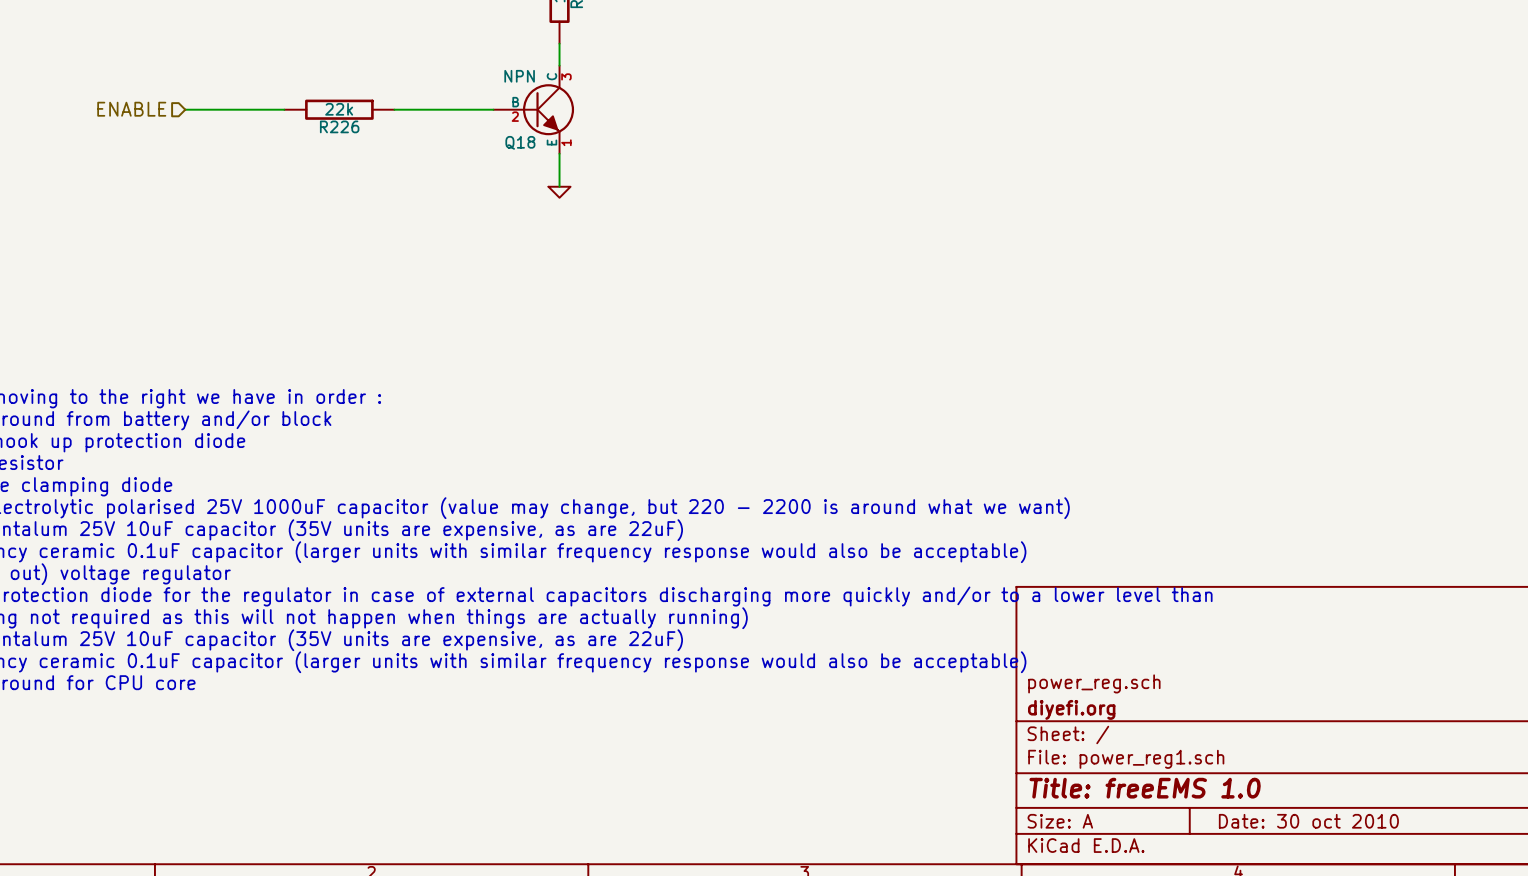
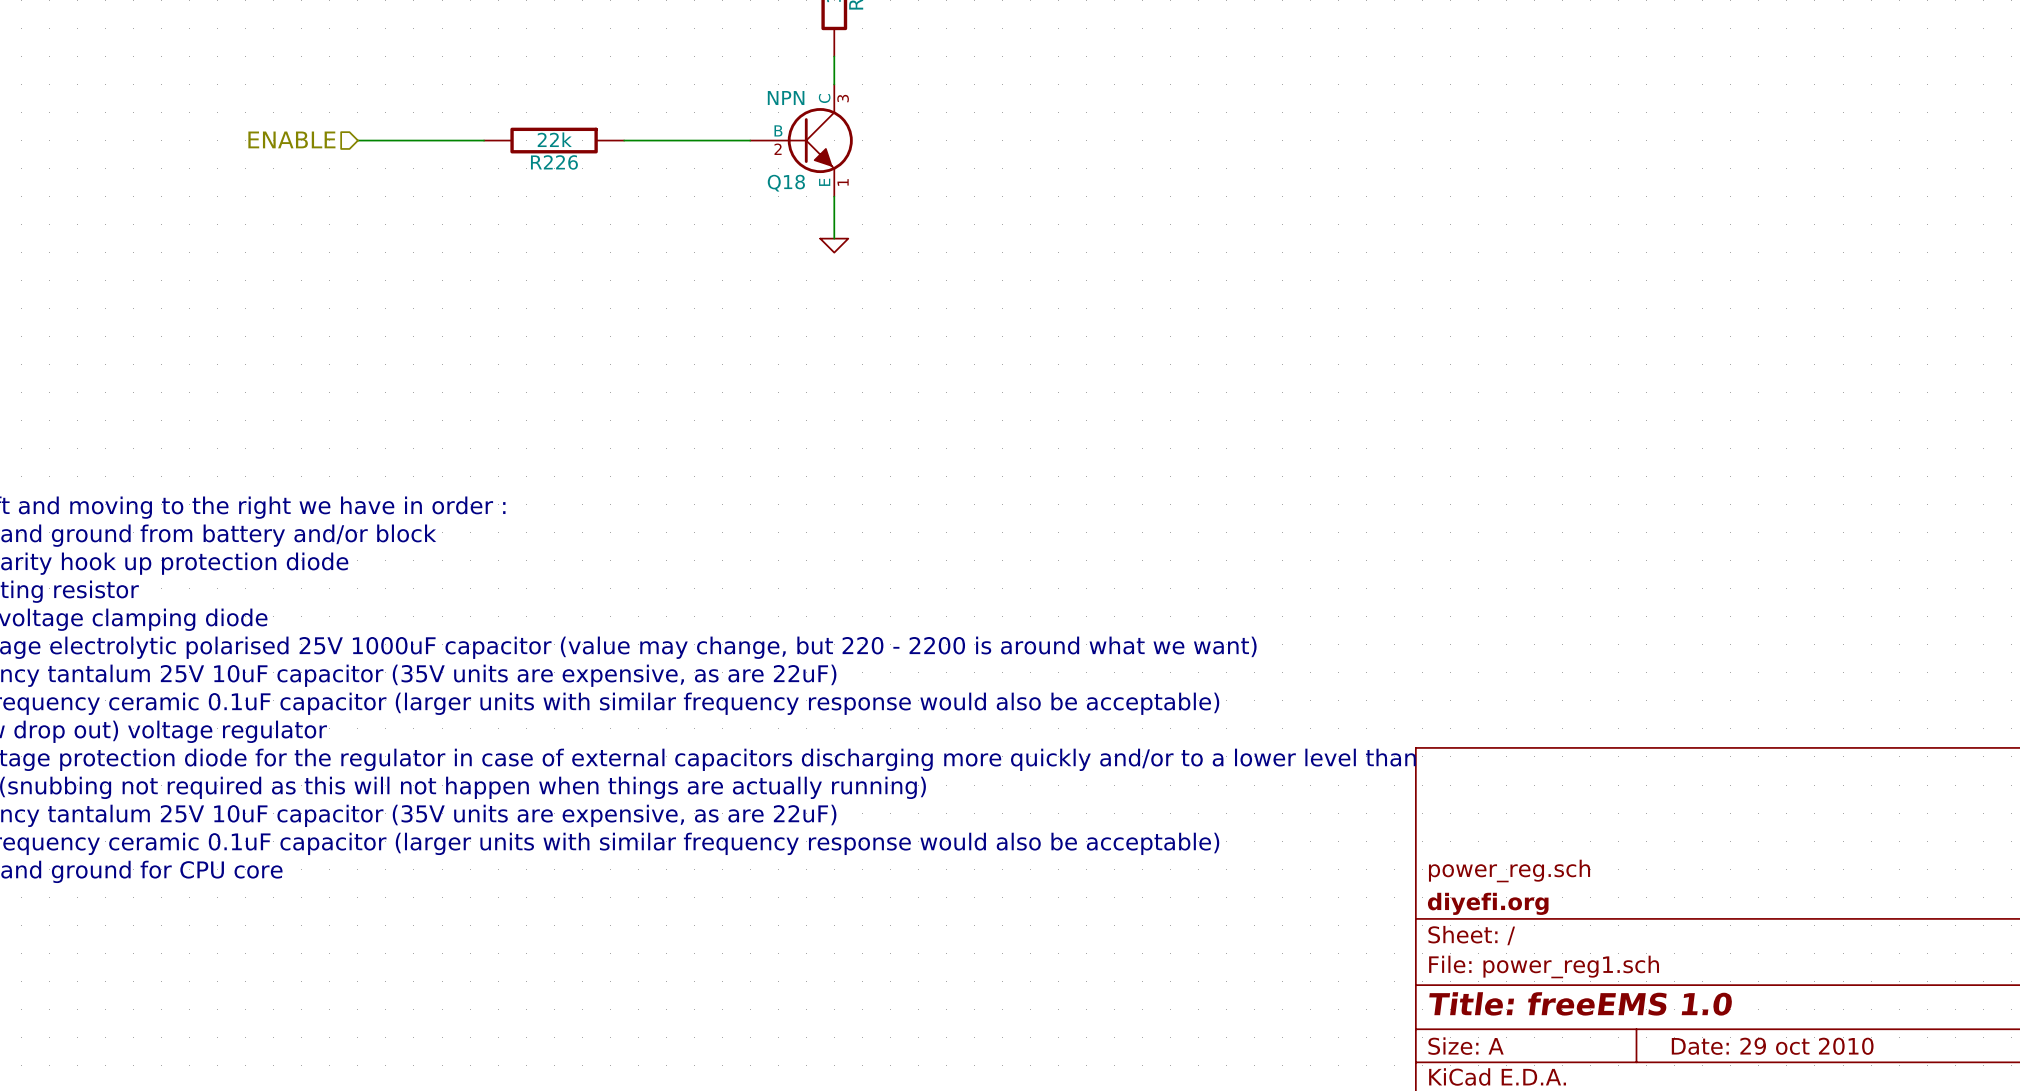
title block: Date: 30 oct 2010 (1308, 821) -> Date: 29 oct 2010 (1772, 1046)

